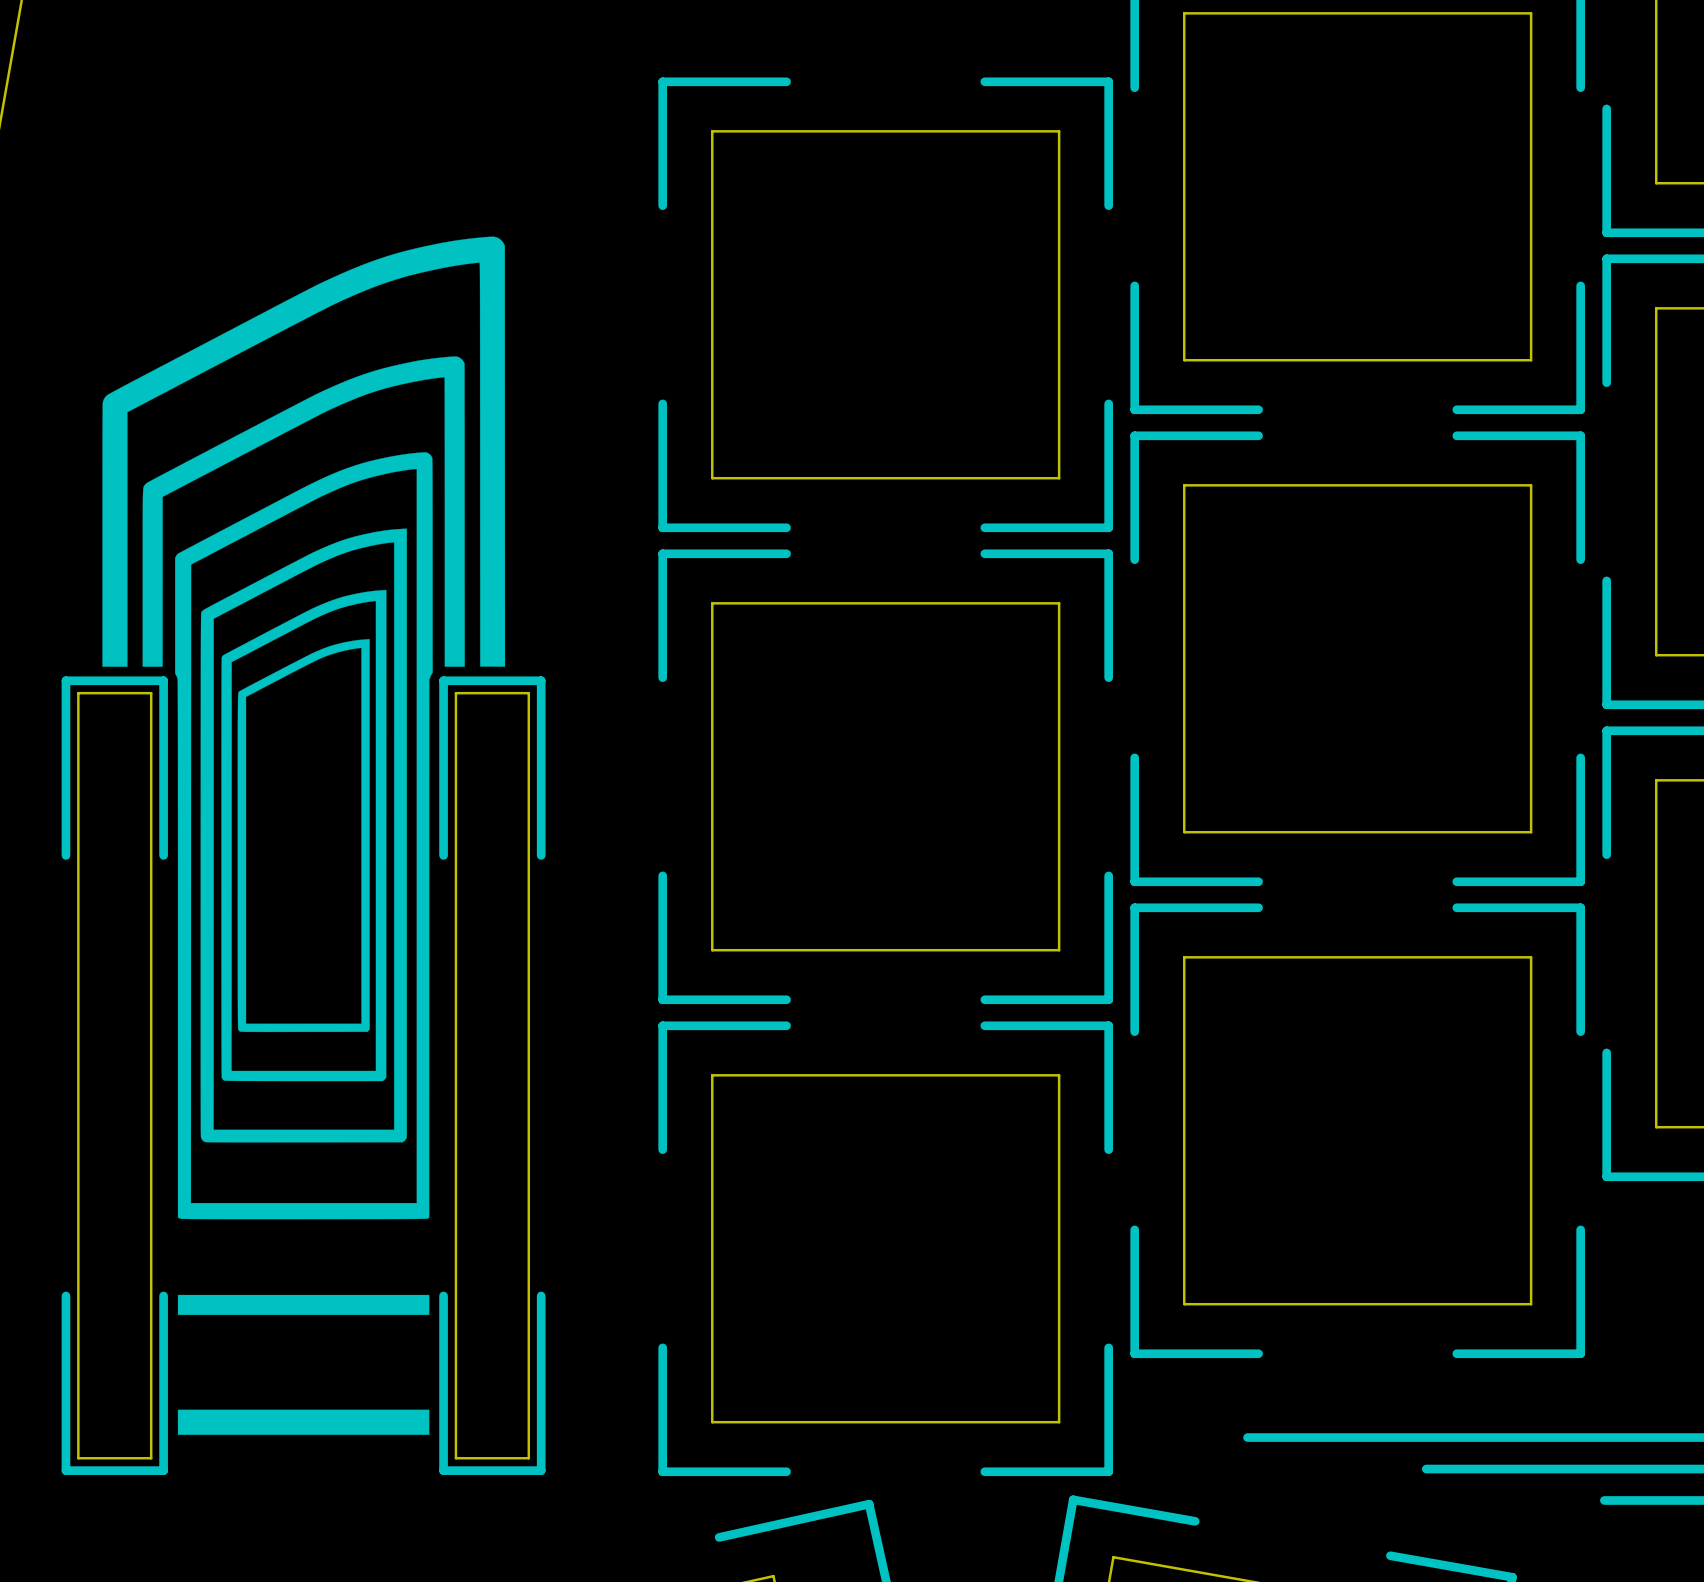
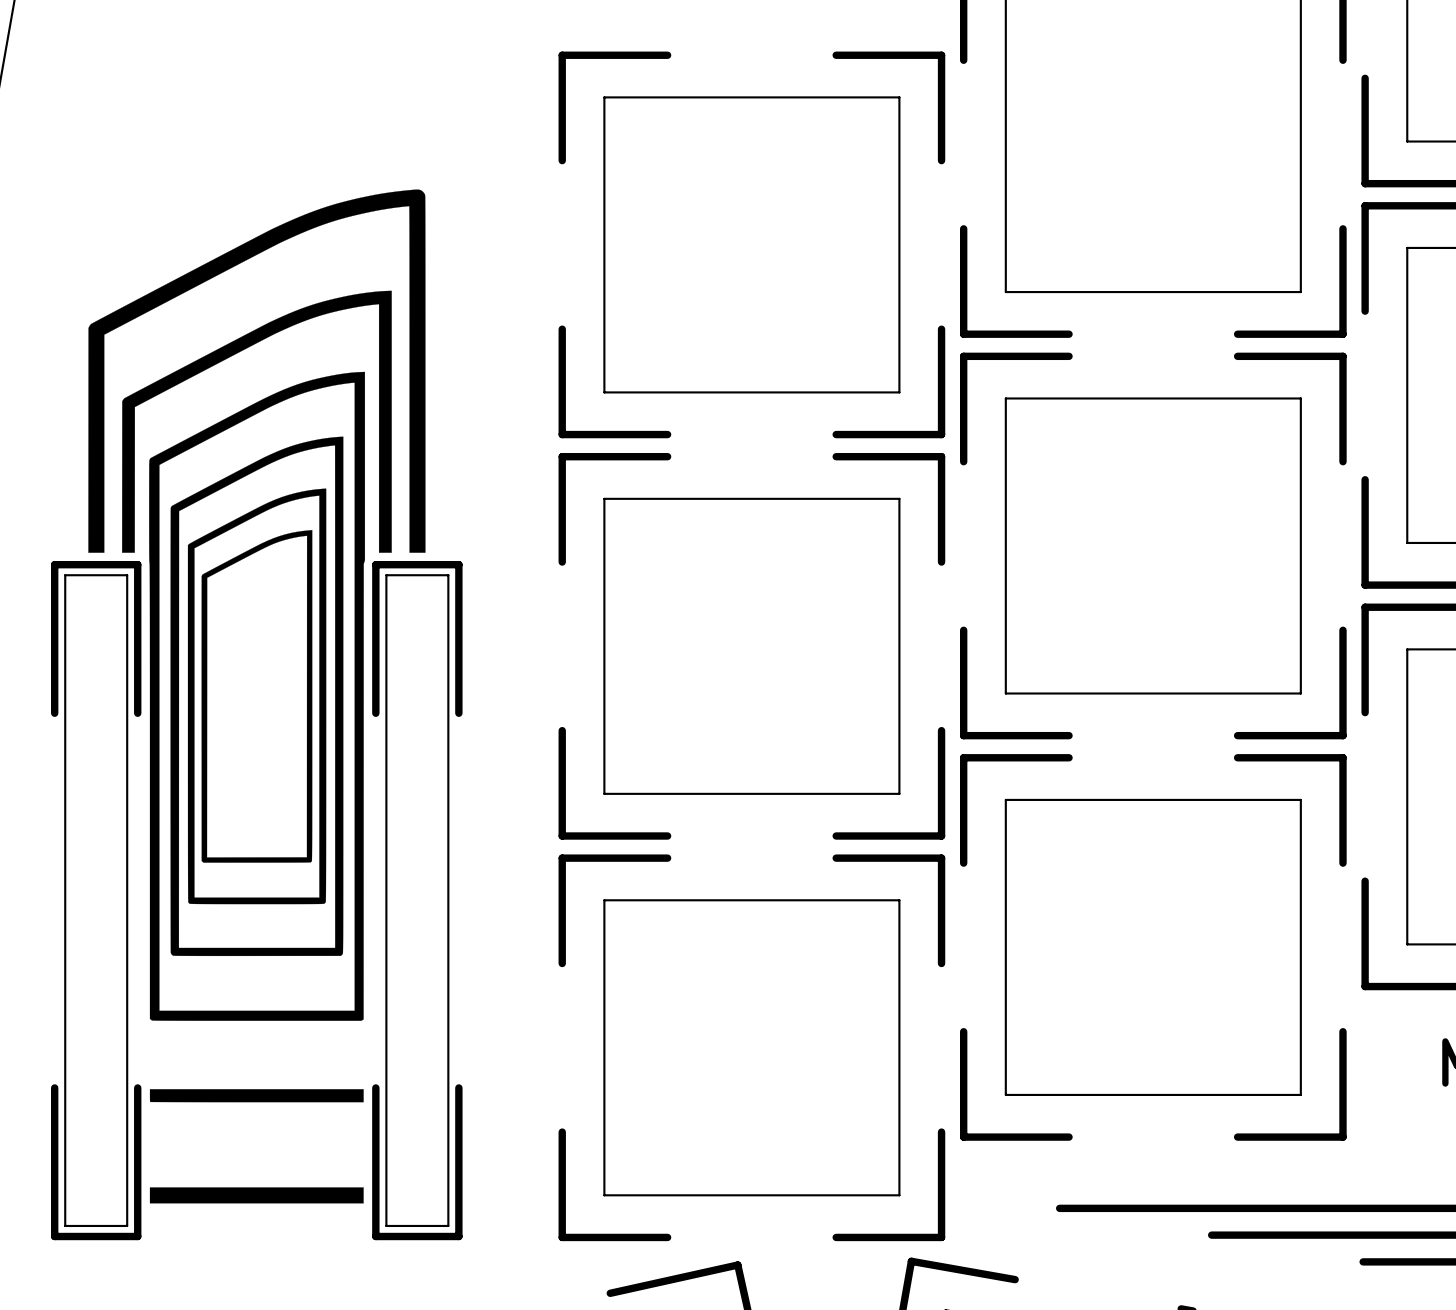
drawing shape: [102, 236, 506, 1435] -> [88, 189, 426, 1204]

